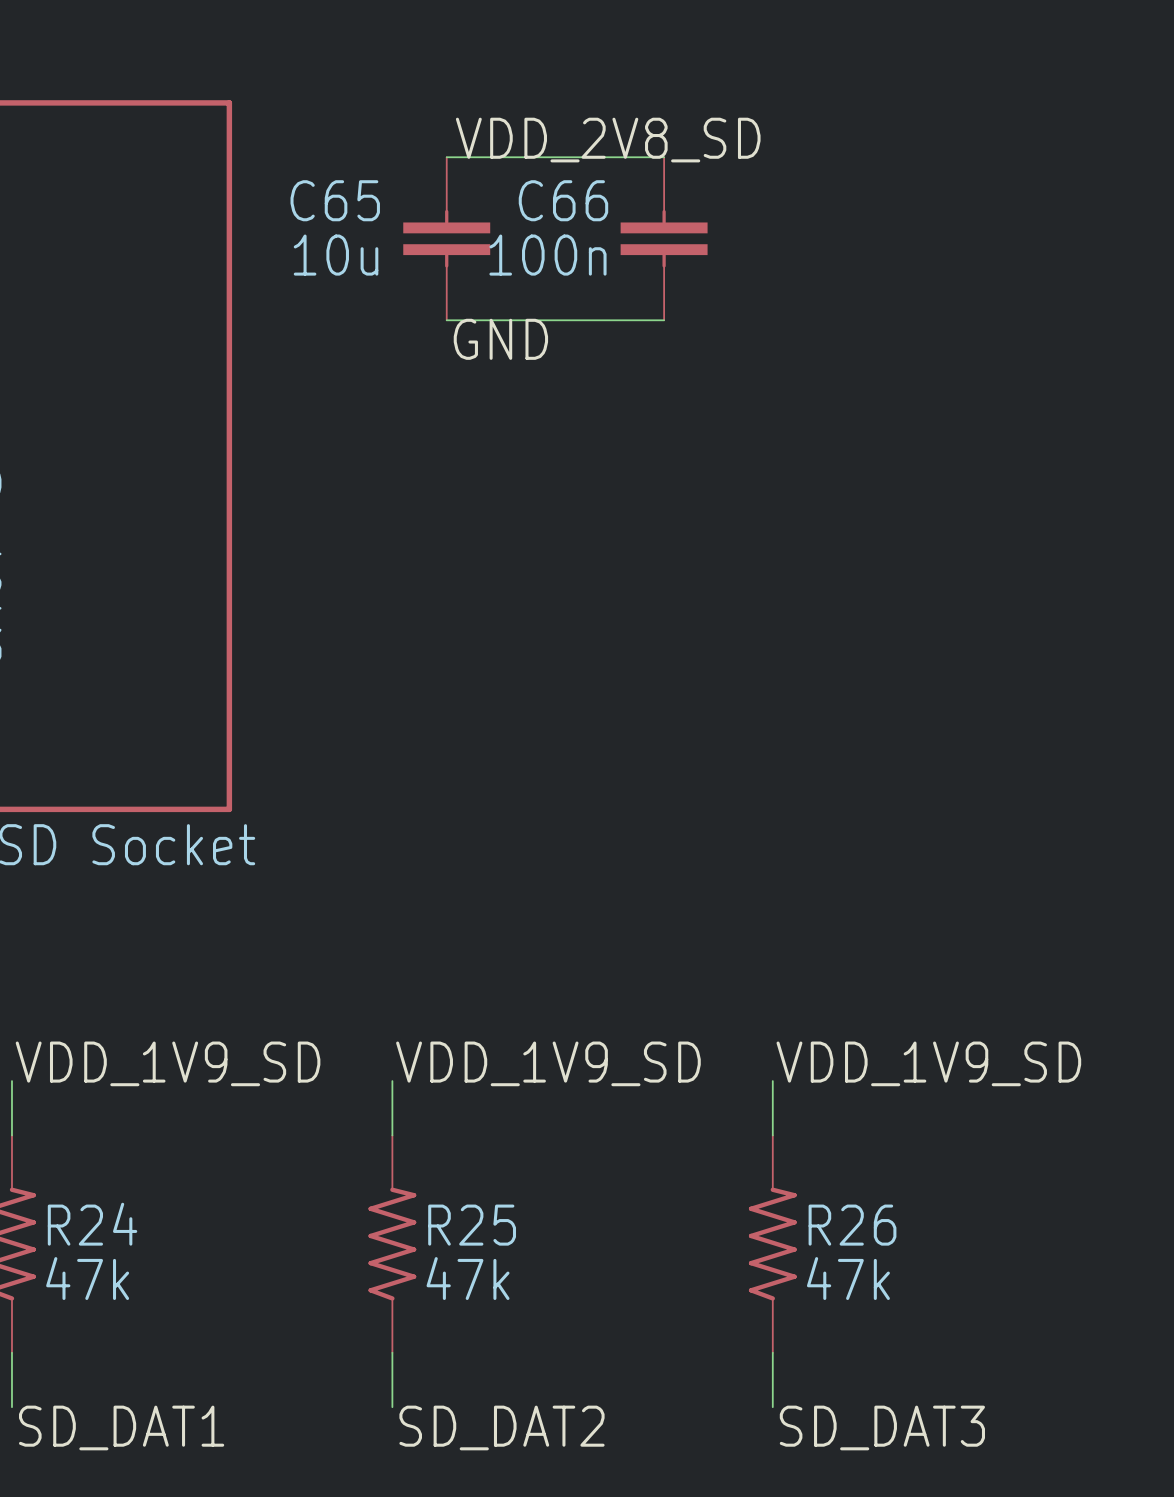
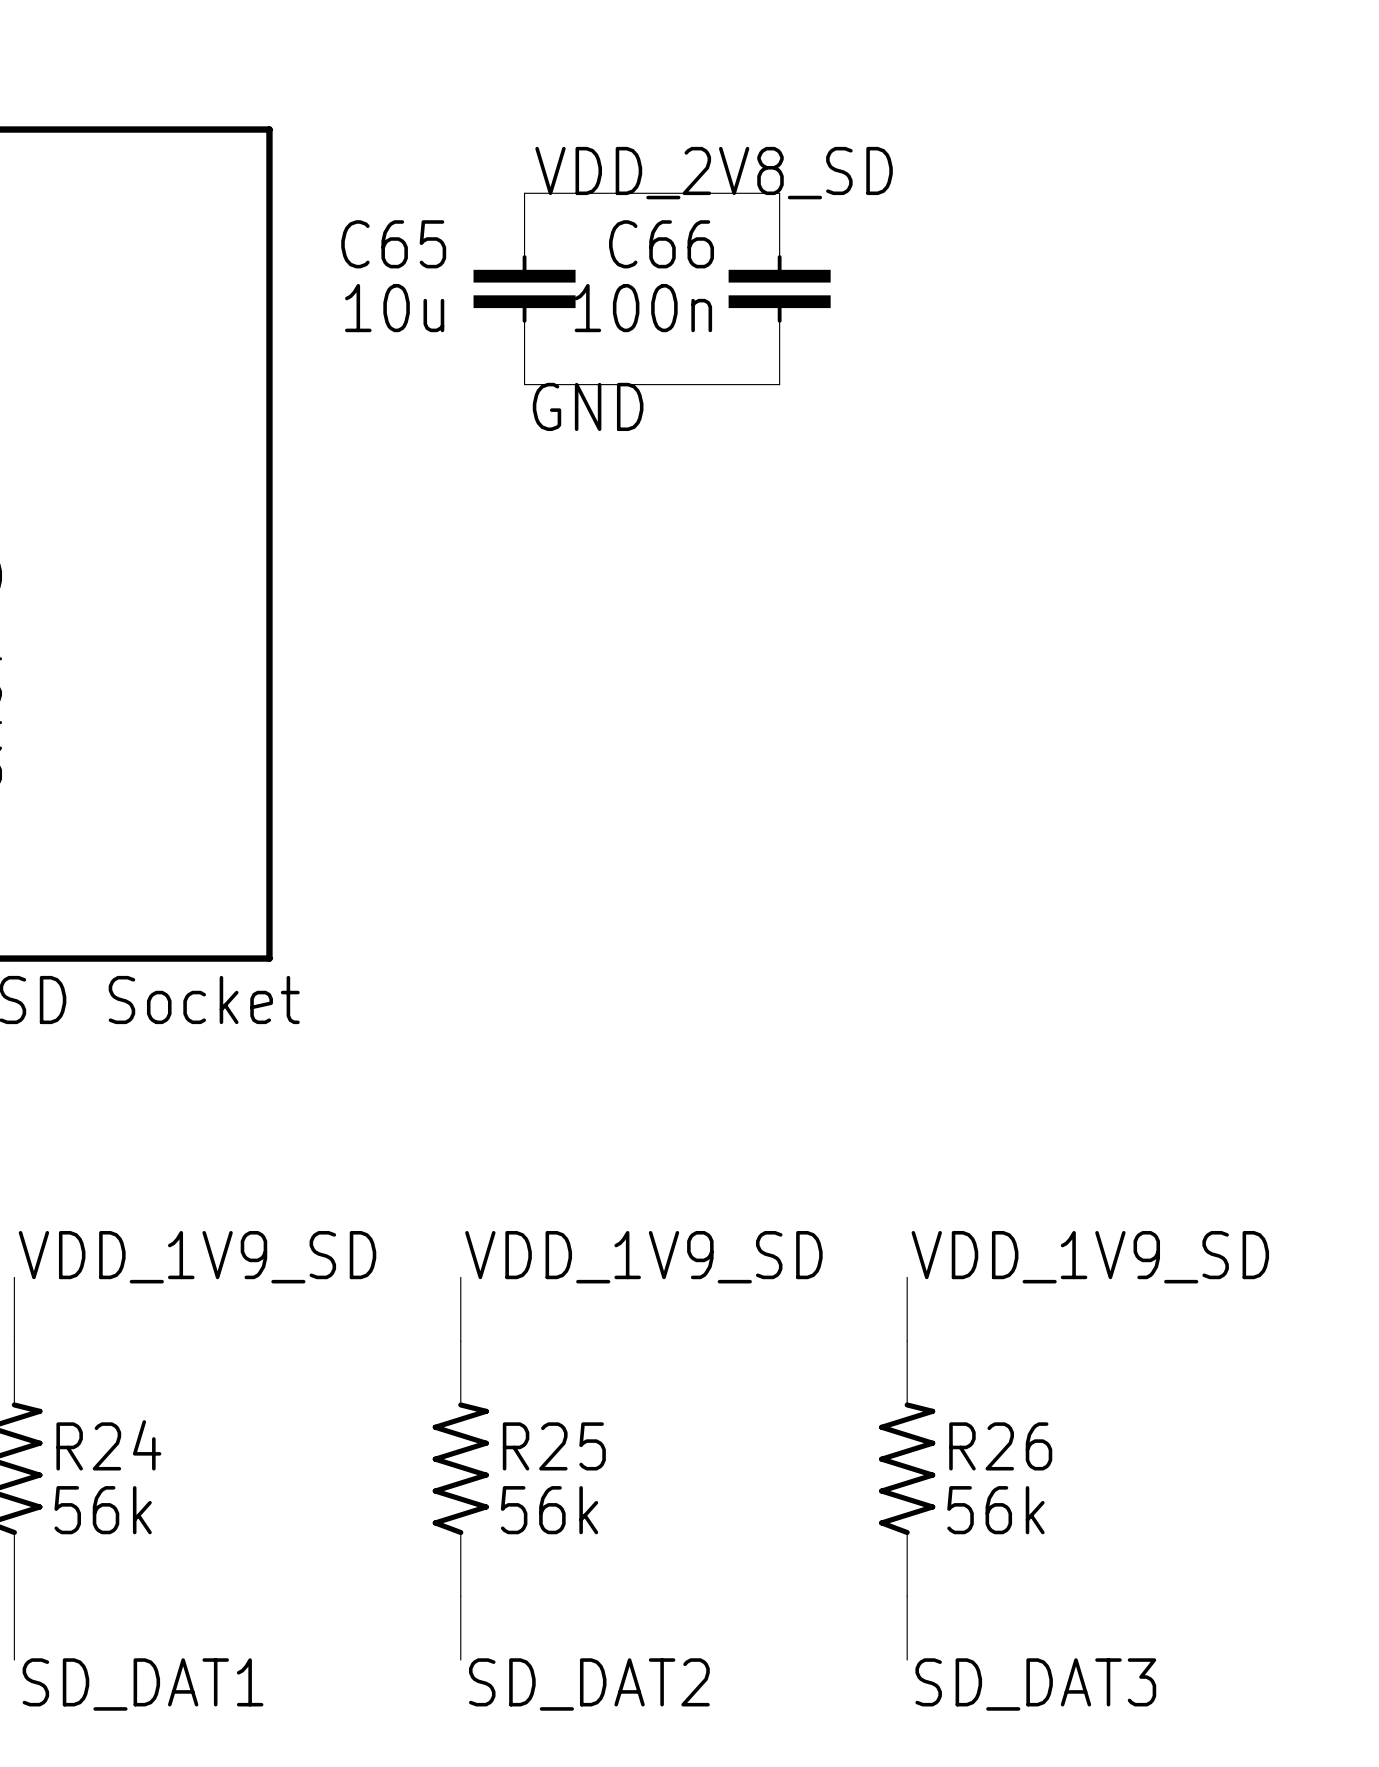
R24 value: 47k (87, 1278) -> 56k (103, 1510)
R25 value: 47k (468, 1278) -> 56k (549, 1510)
R26 value: 47k (848, 1278) -> 56k (995, 1510)

